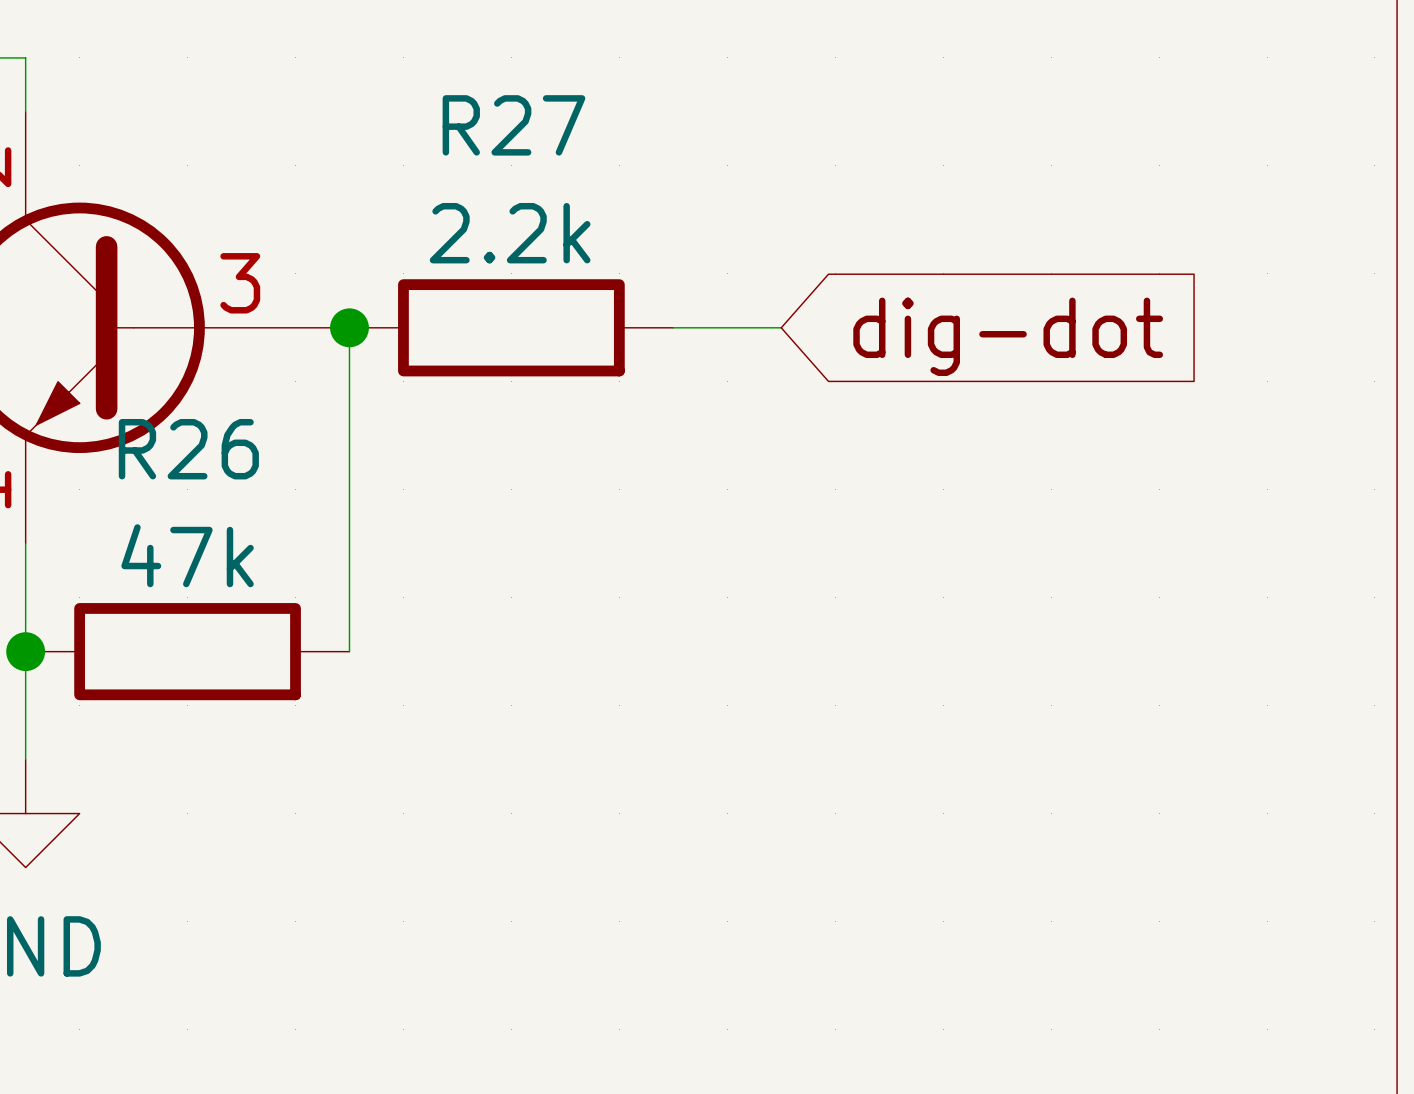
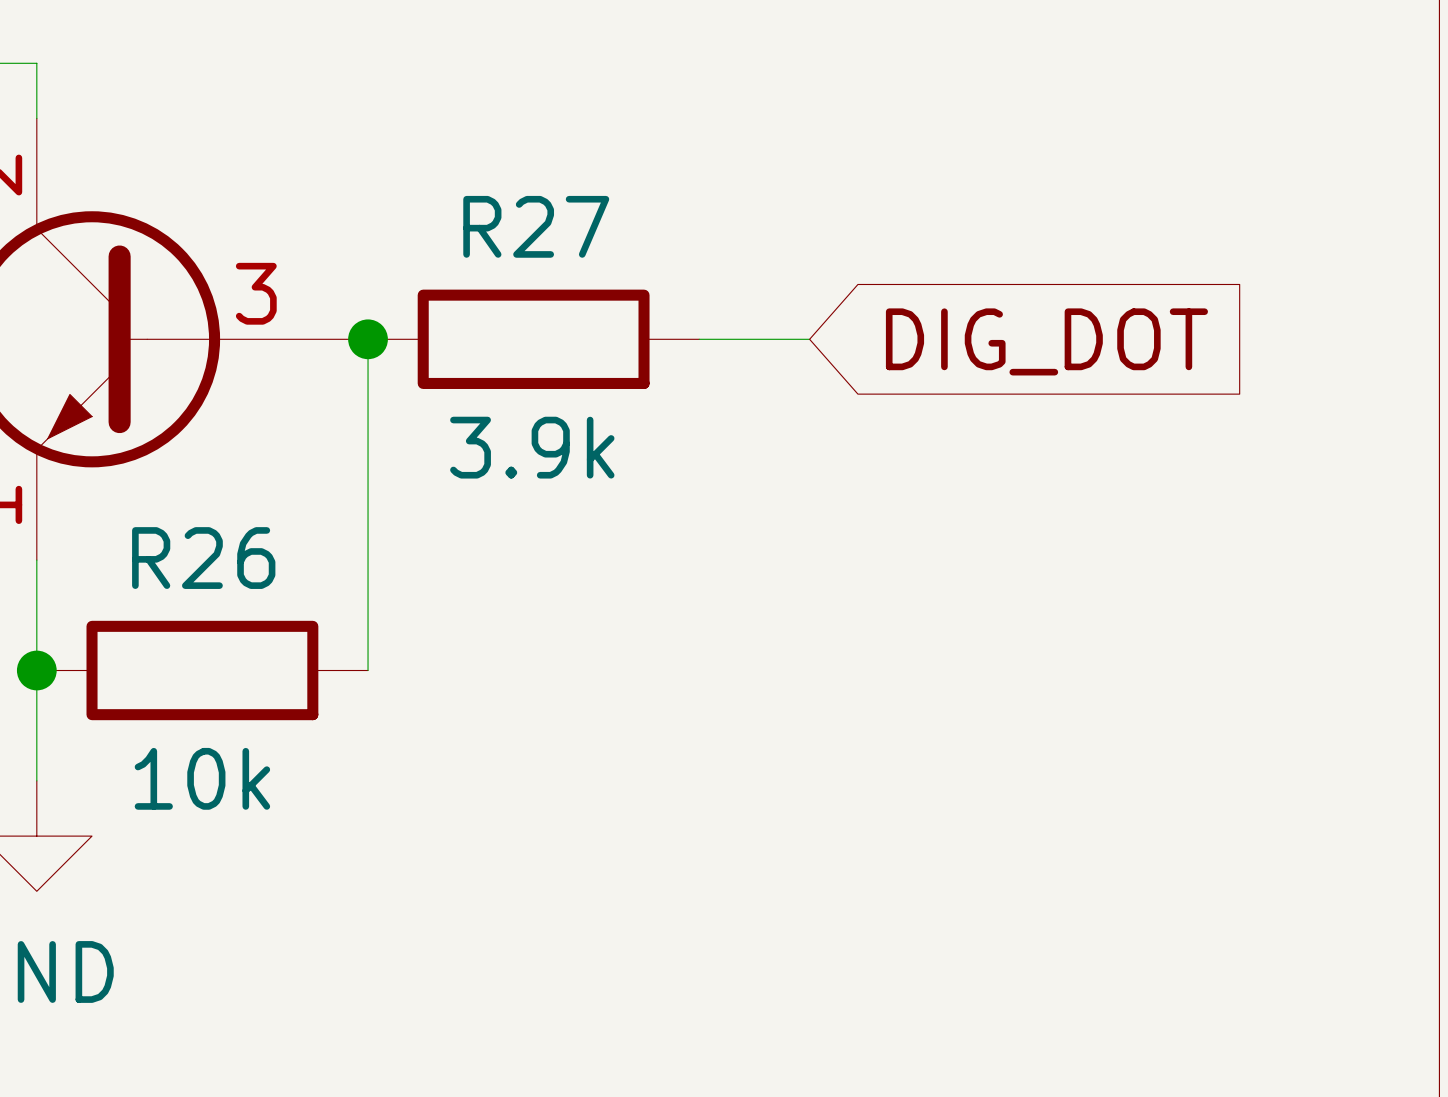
R27 name position: R27 (513, 125) -> R27 (536, 226)
R27 value: 2.2k (510, 233) -> 3.9k (532, 447)
global label: dig-dot (1008, 336) -> DIG_DOT (1046, 341)
R26 name position: R26 (188, 449) -> R26 (203, 558)
R26 value: 47k (187, 555) -> 10k (202, 778)

